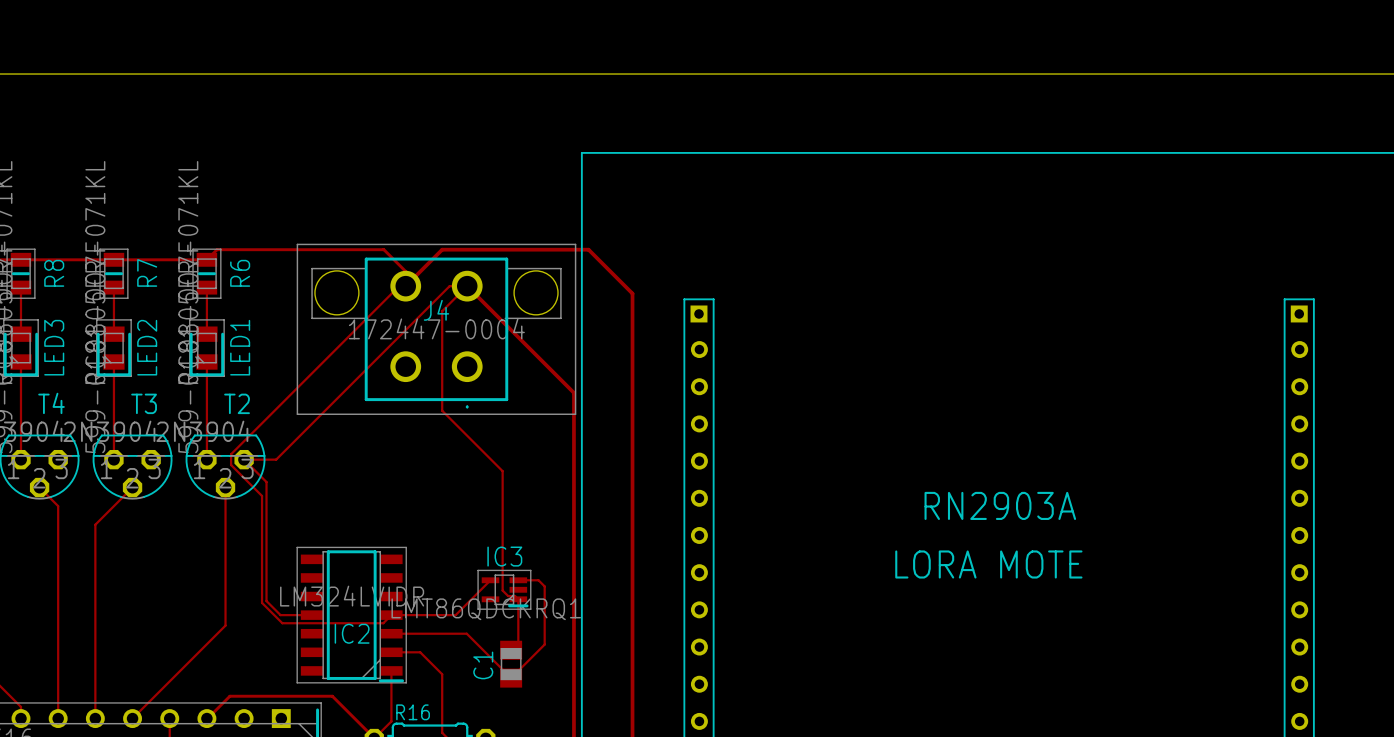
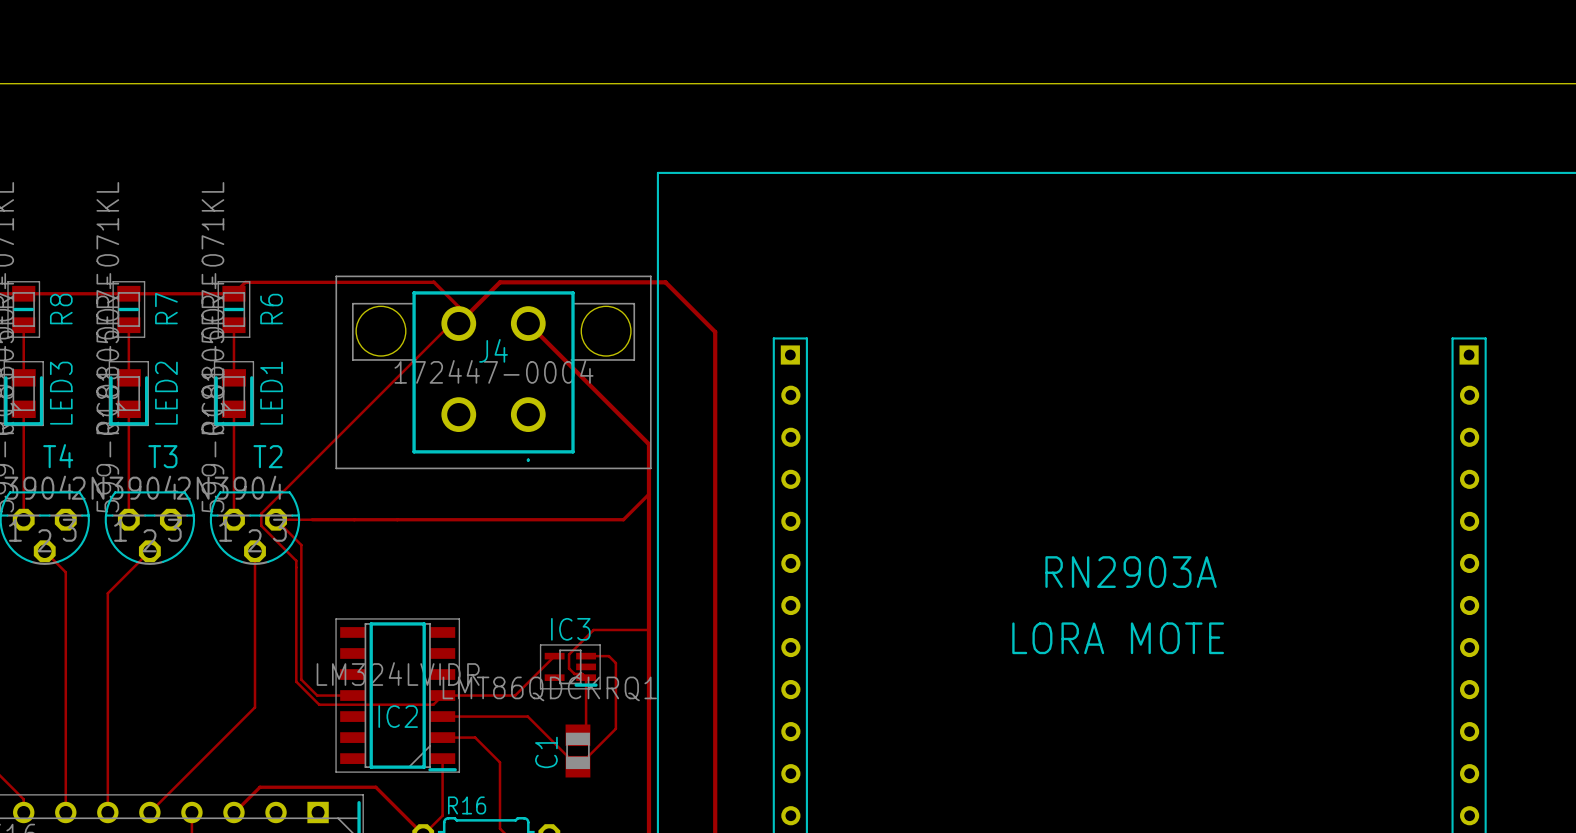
track: (276, 459) (449, 286) (467, 286) (442, 311) (442, 410) (502, 471) (503, 591) -> (312, 519) (623, 519) (648, 494)
track: none -> (648, 629) (593, 629) (569, 654) (569, 668)

